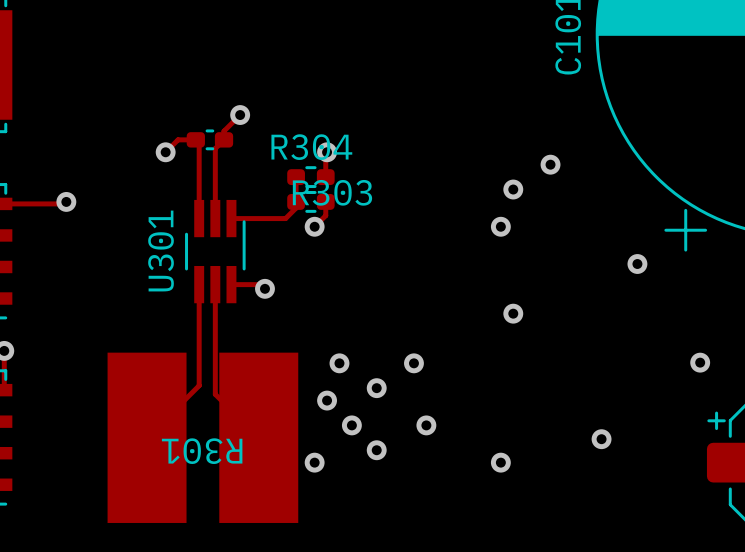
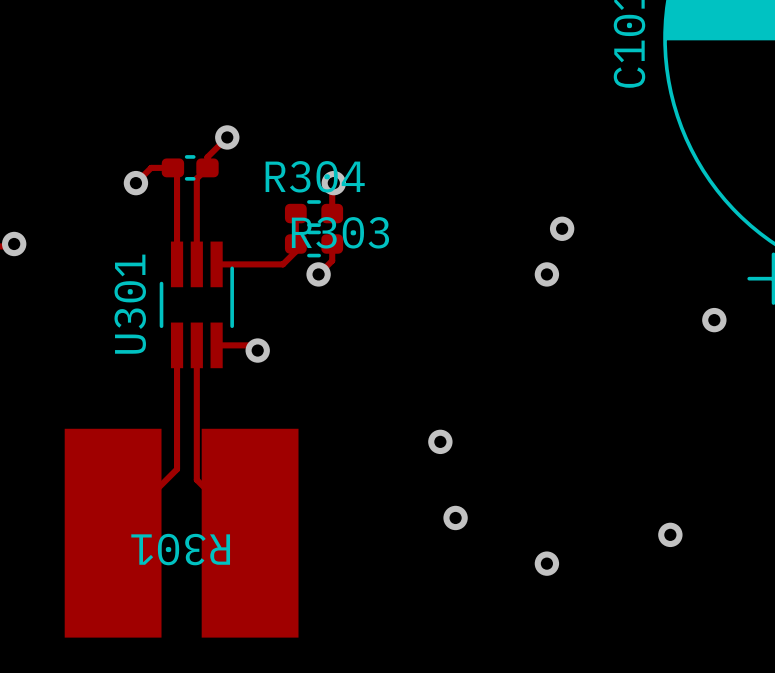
via: (550, 164) -> none
via: (513, 313) -> none
via: (339, 363) -> none
via: (376, 388) -> none
via: (327, 400) -> none
via: (351, 425) -> none
via: (376, 450) -> none
via: (314, 462) -> none

